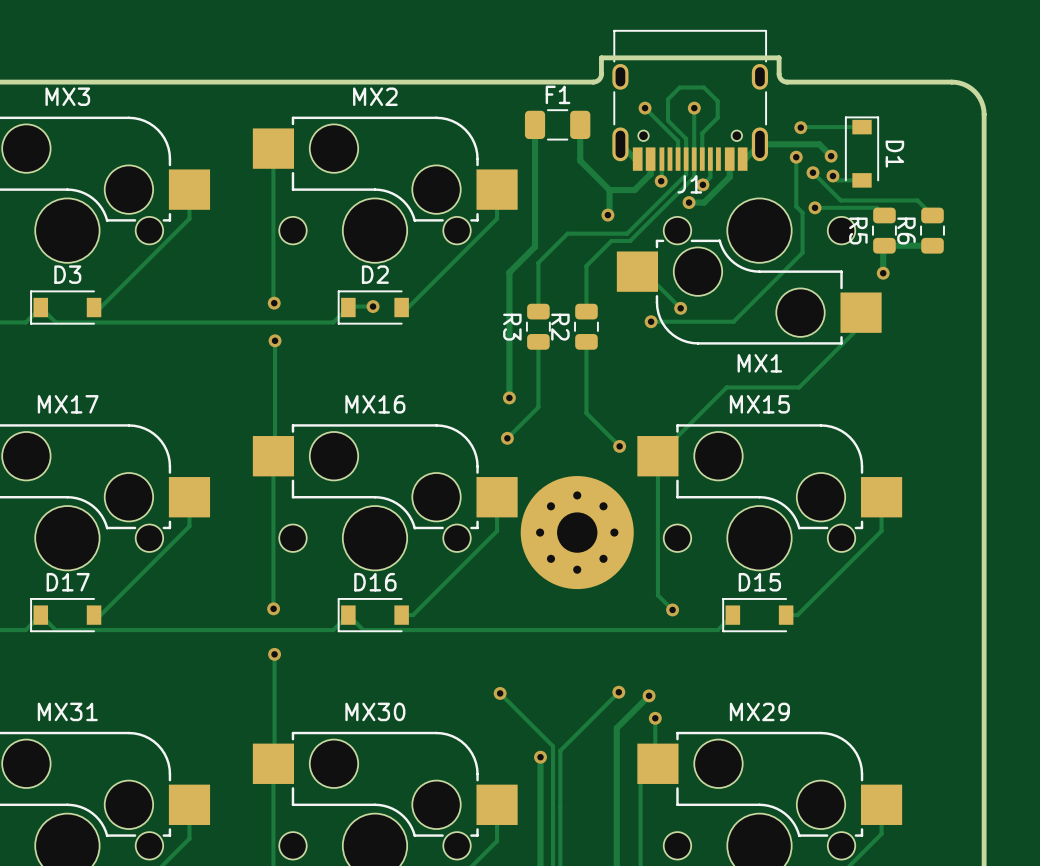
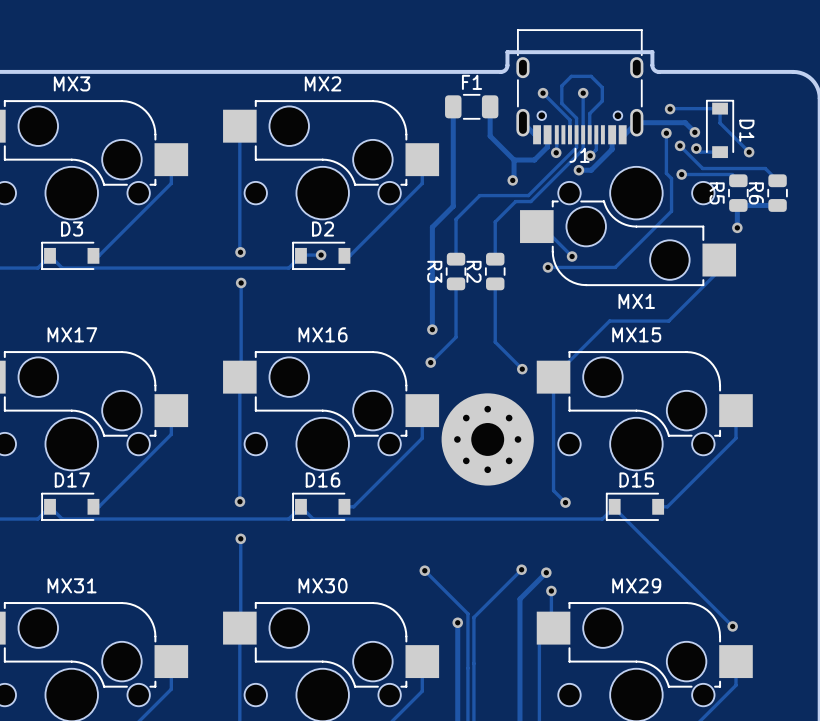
track: none -> (720, 108) (720, 123) (749, 152)
via: none -> (749, 152)
track: none -> (614, 506) (732, 626)
via: none -> (732, 626)

